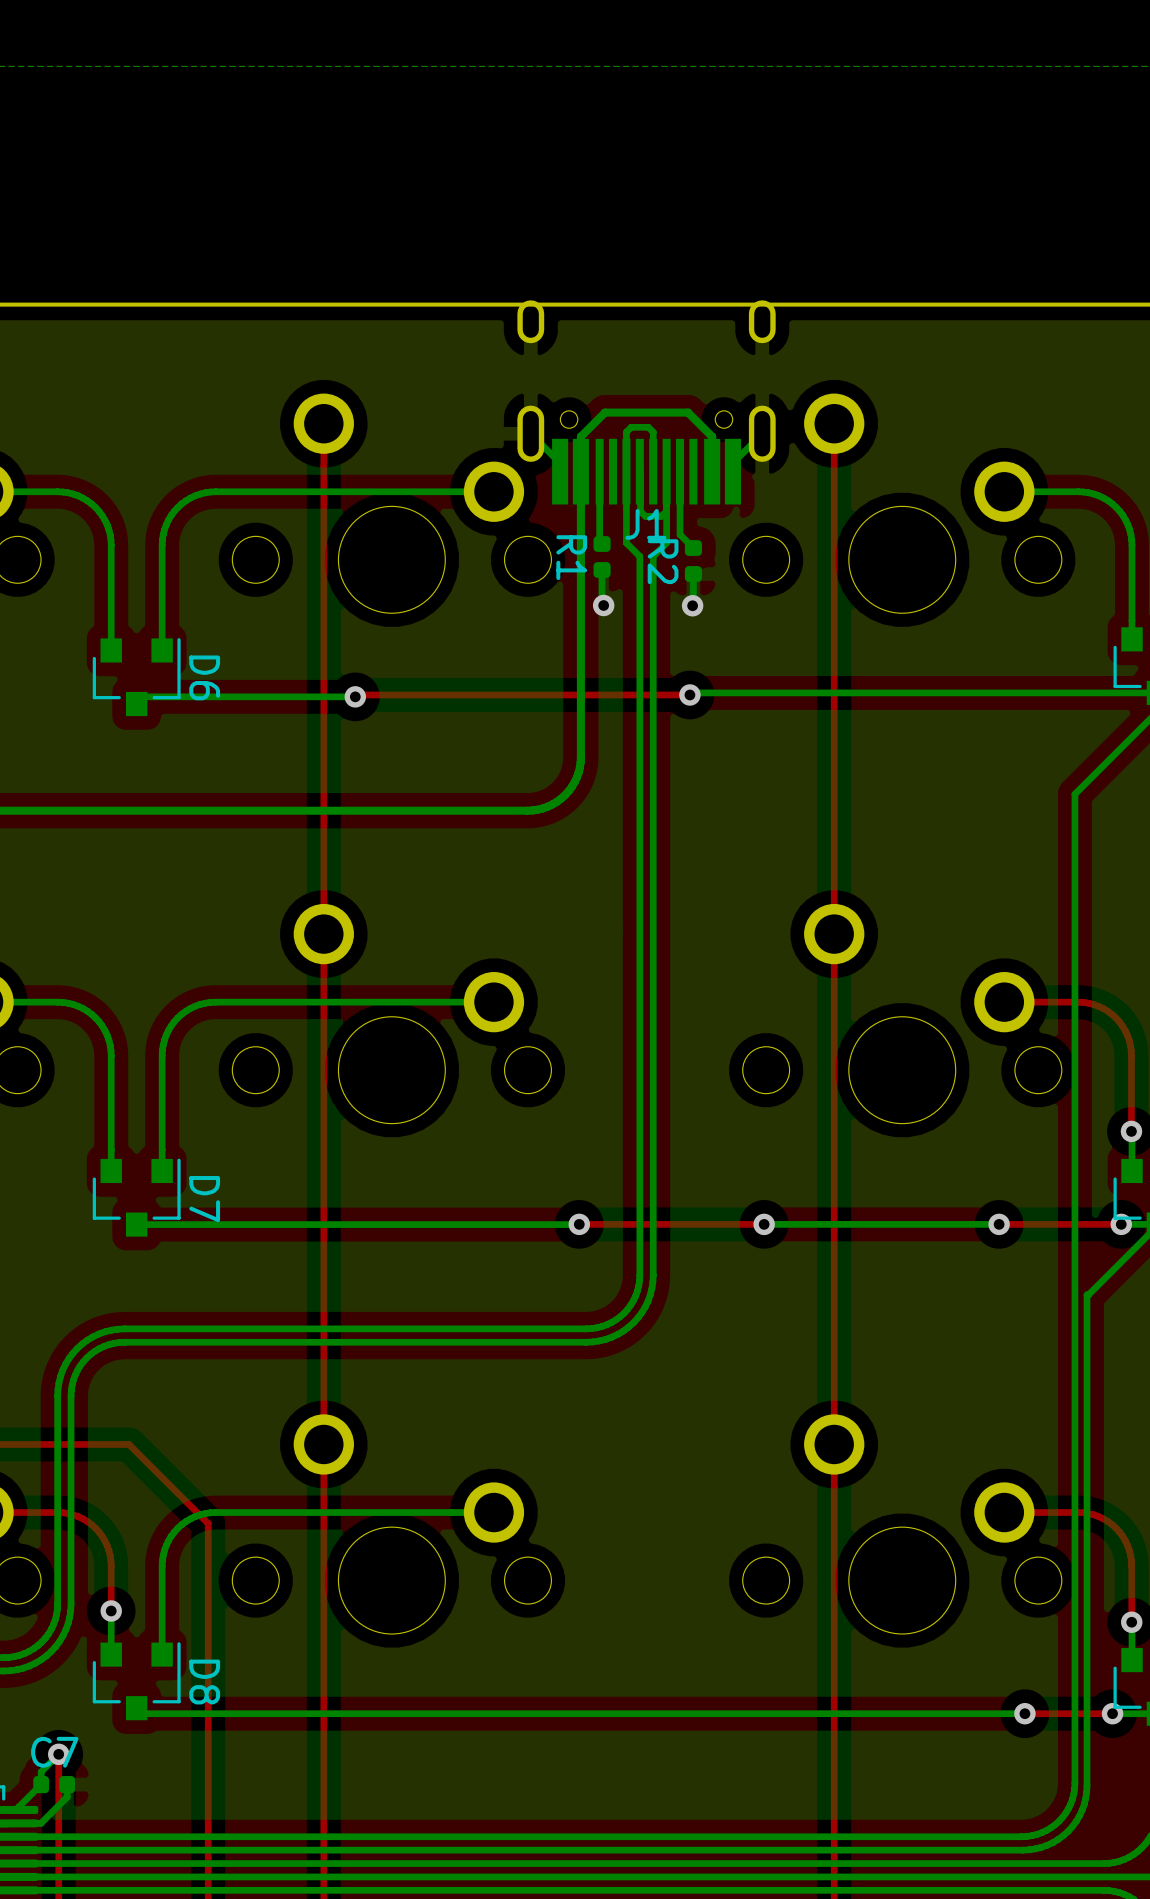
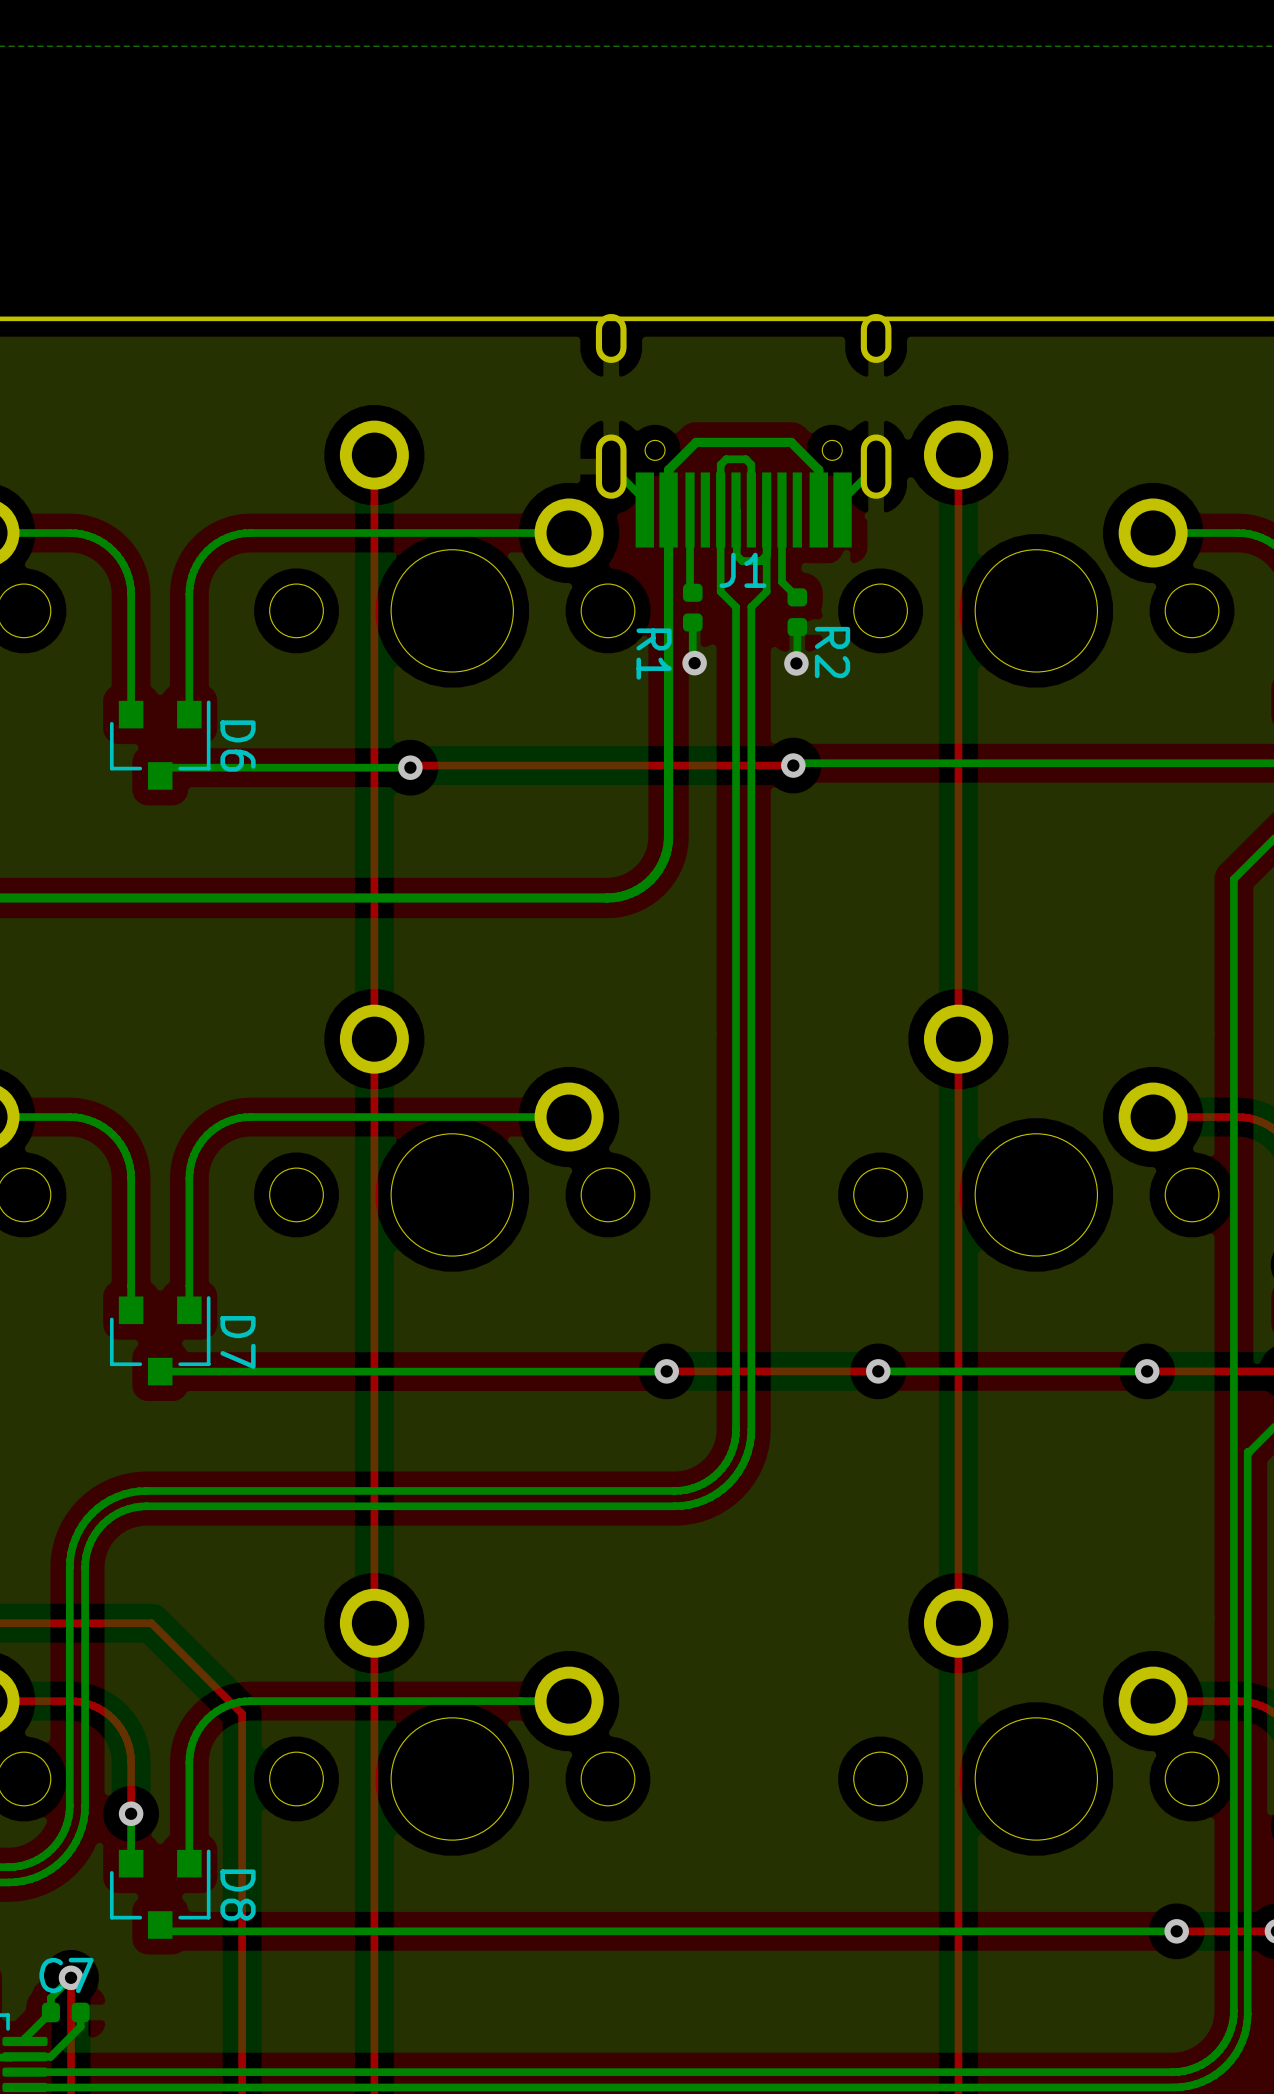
R1 name position: R1 (571, 557) -> R1 (654, 654)
R2 name position: R2 (663, 561) -> R2 (832, 652)

